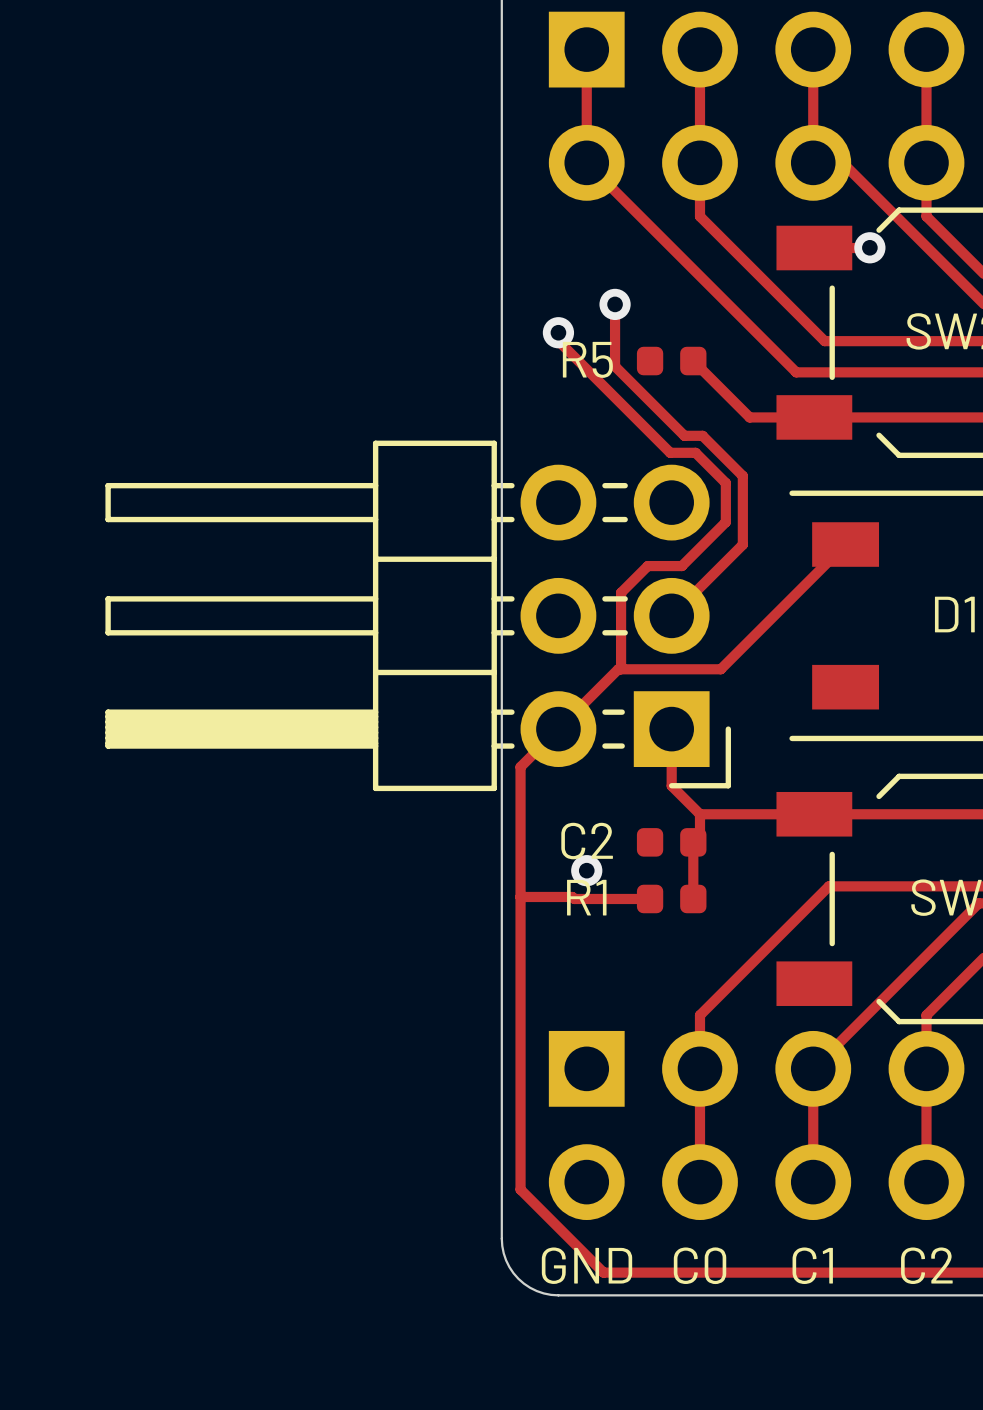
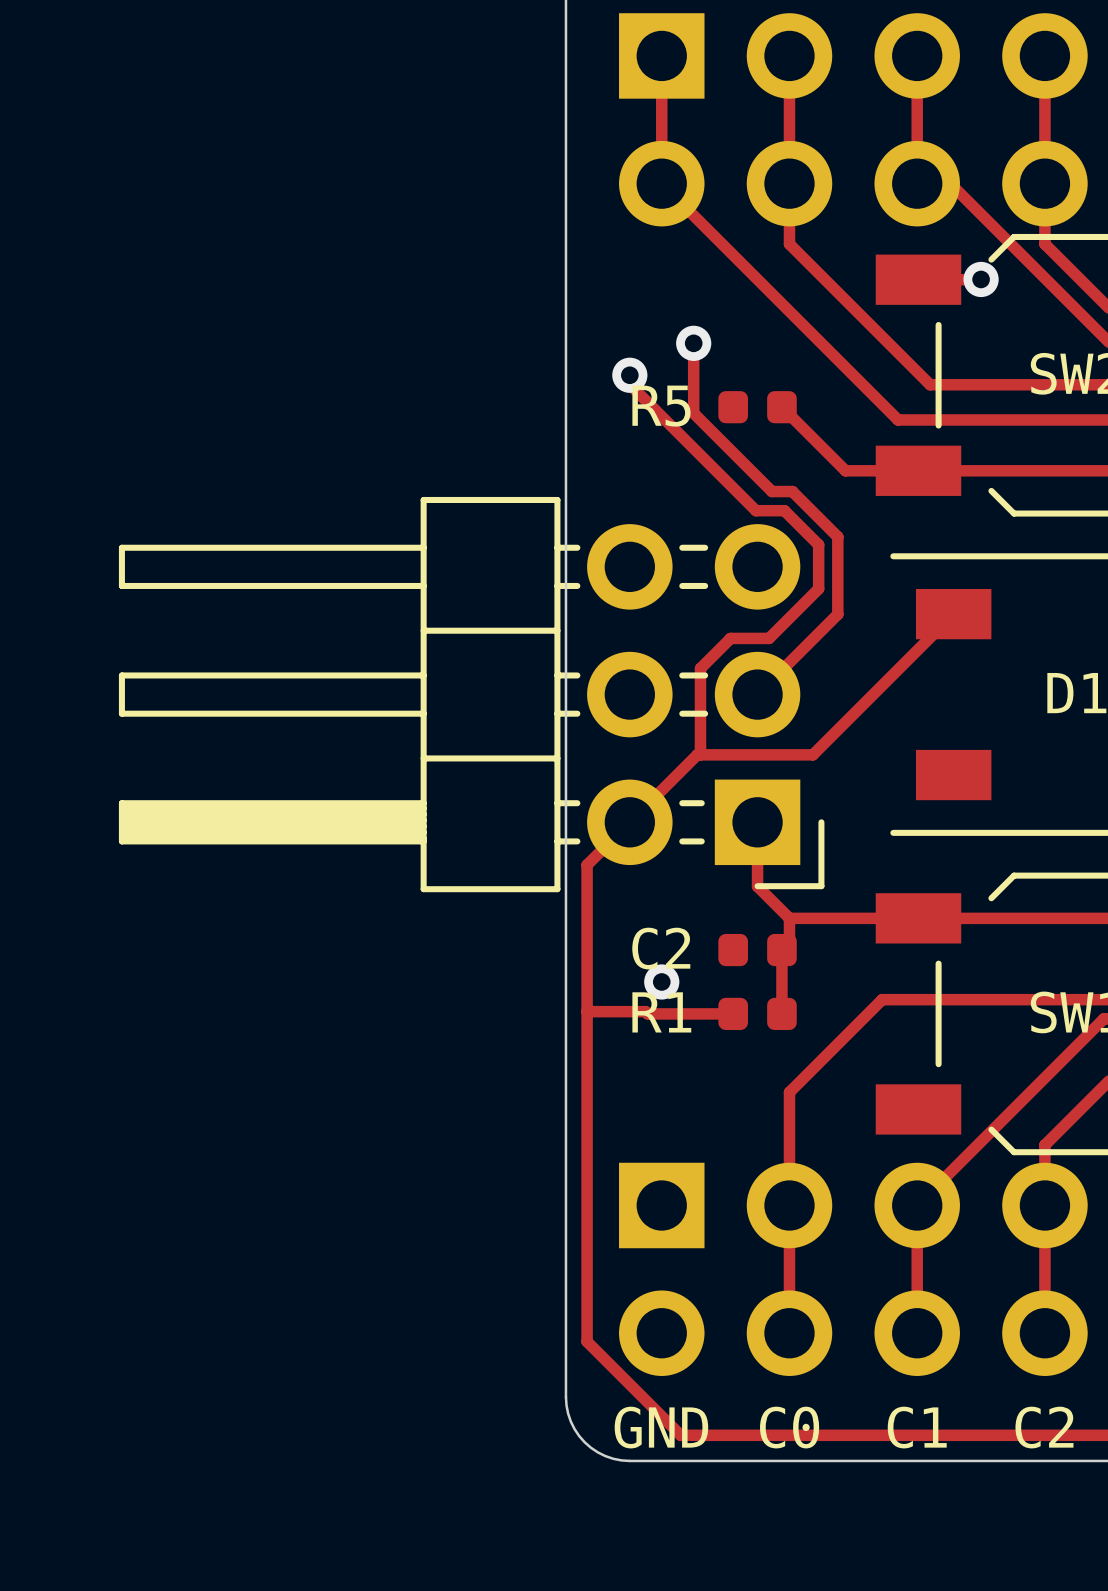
track: (828, 886) (700, 1015) -> (934, 999) (882, 999) (789, 1092) (789, 1145)

